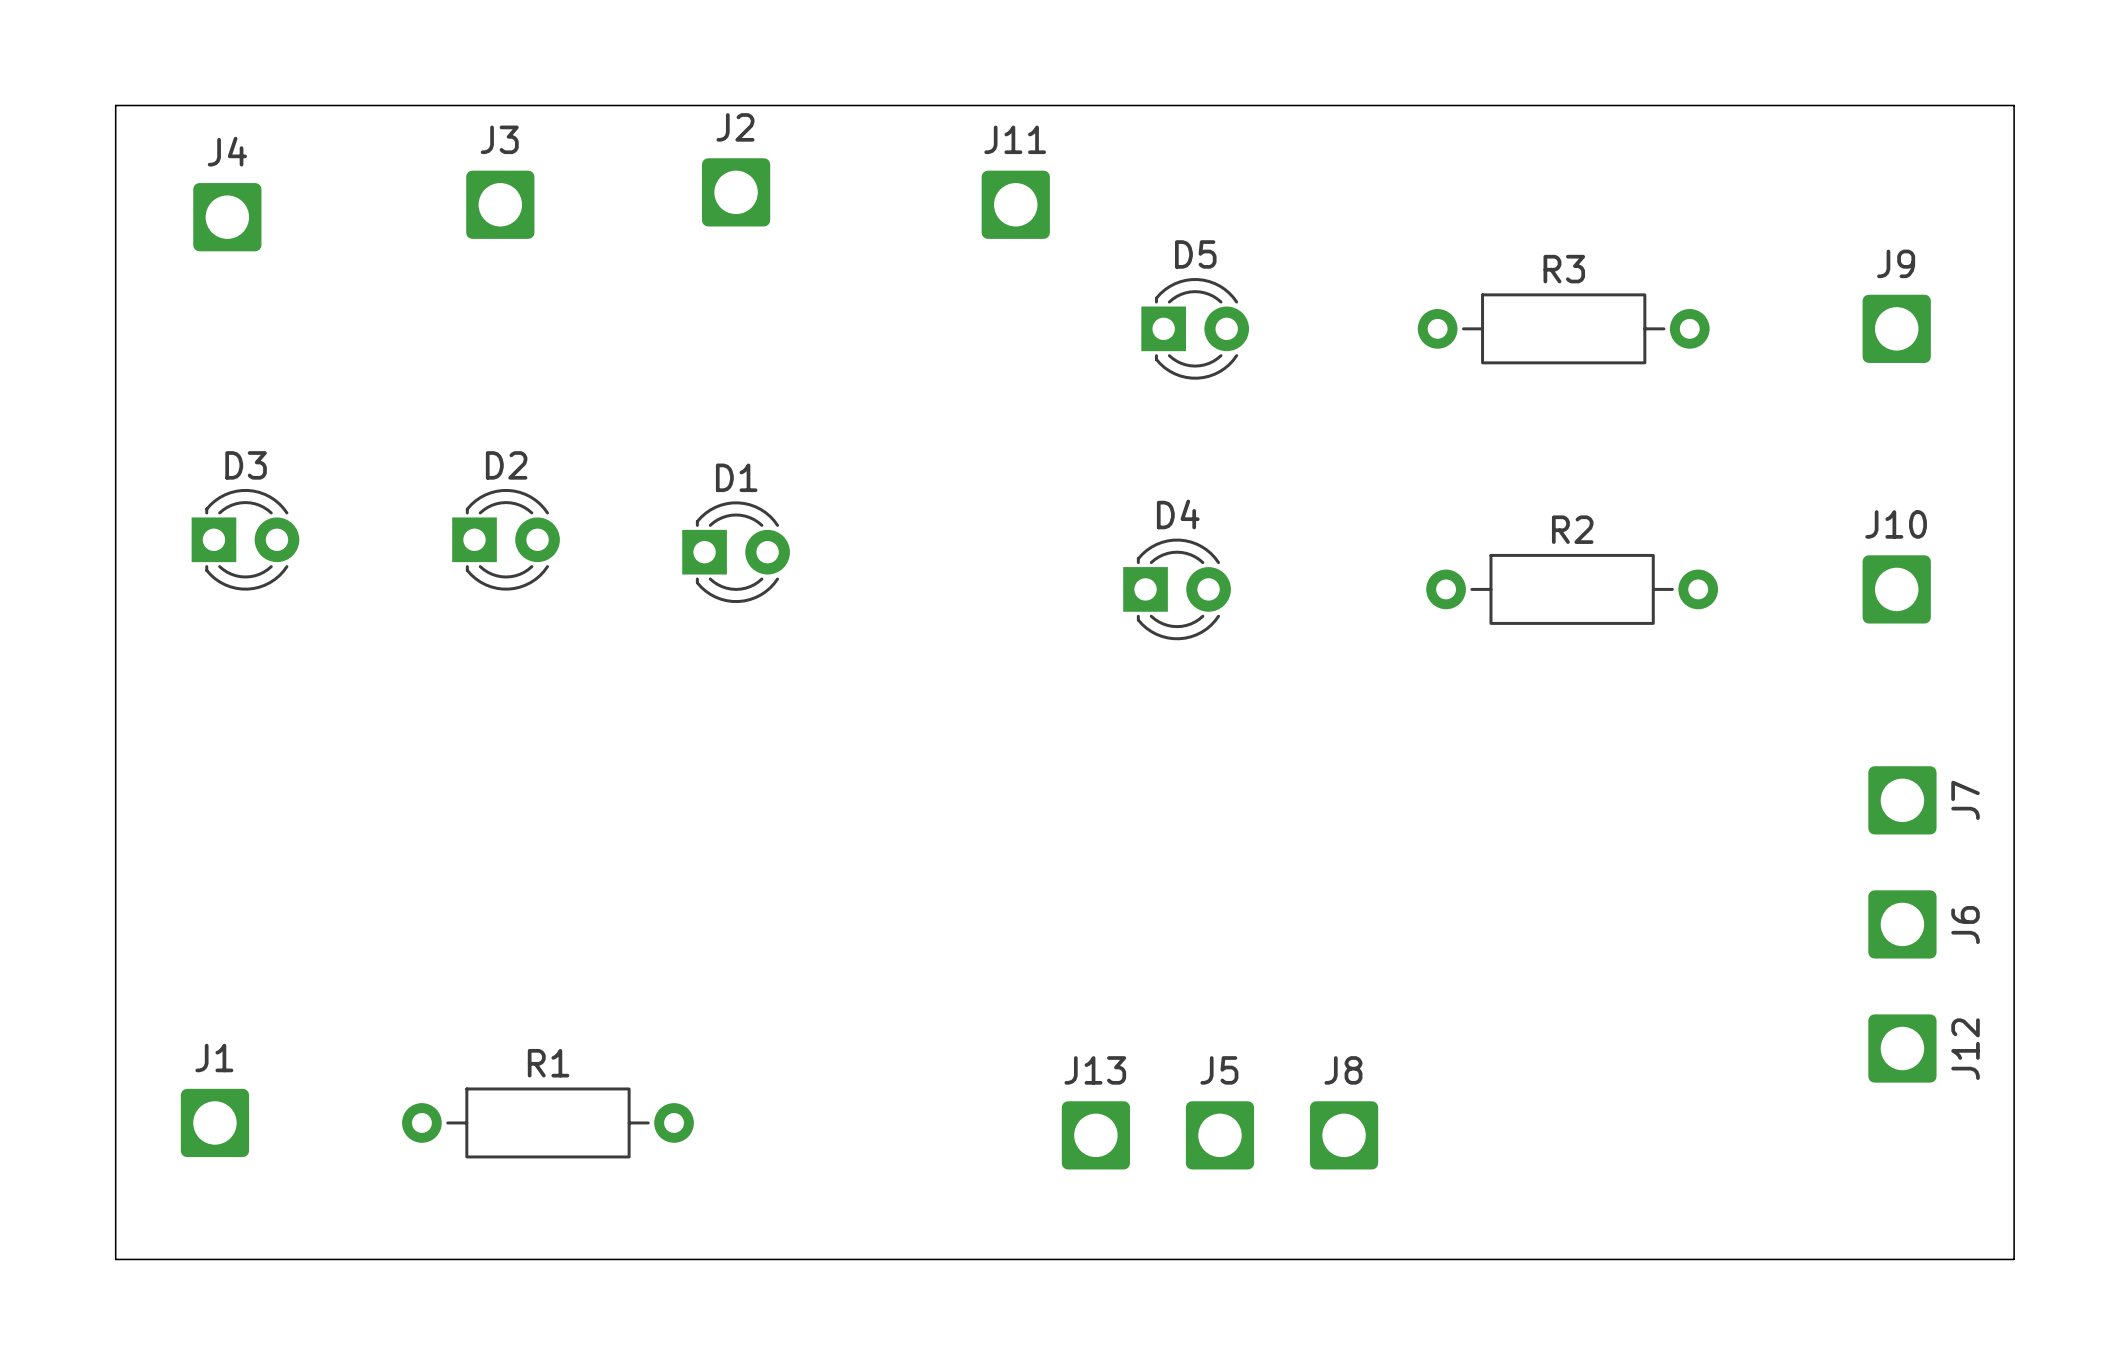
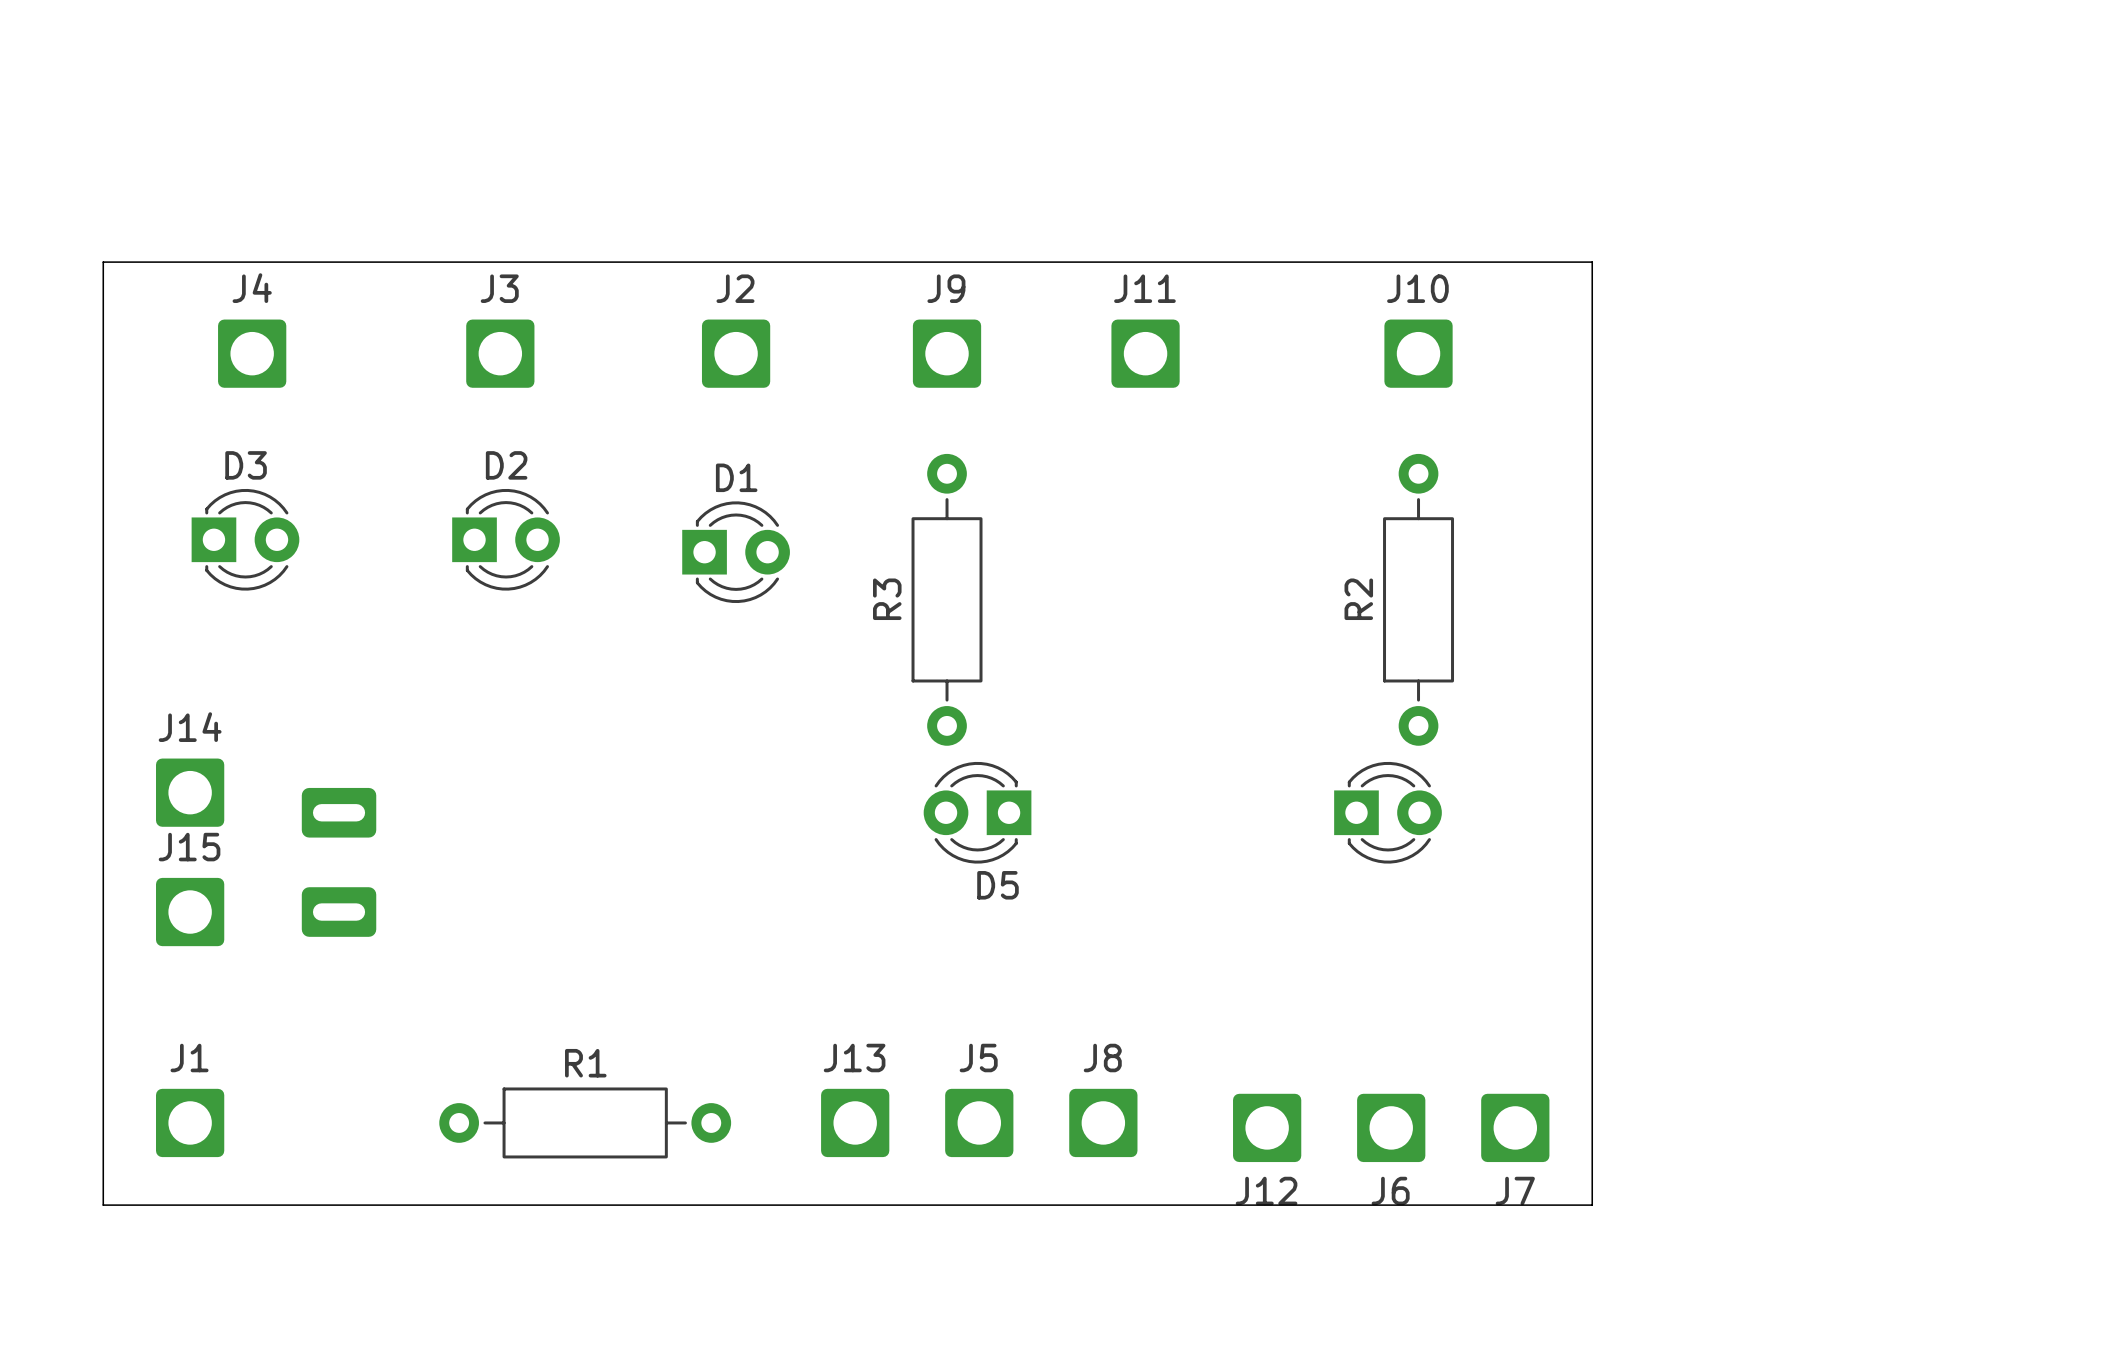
board edge: (115, 105) (2014, 105) (2014, 1259) (115, 1259) (115, 105) -> (103, 262) (103, 1205) (1592, 1205) (1592, 262) (103, 262)
J2 position: (736, 192) -> (736, 353)
J3 position: (500, 204) -> (500, 353)
J11 position: (1015, 204) -> (1145, 353)
J4 position: (227, 217) -> (252, 353)
R3 name position: R3 (1564, 269) -> R3 (887, 599)
D5 rotation: 0° (1195, 328) -> 180° (977, 812)
D5 position: (1195, 328) -> (977, 812)
R3 rotation: 0° (1563, 328) -> 90° clockwise (947, 599)
R3 position: (1563, 328) -> (947, 599)
J9 position: (1896, 328) -> (947, 353)
R2 name position: R2 (1572, 529) -> R2 (1358, 599)
D4: (1177, 589) -> none
R2 rotation: 0° (1572, 589) -> 90° clockwise (1418, 599)
J10 position: (1896, 589) -> (1418, 353)
J14: none -> (190, 792)
J7 position: (1902, 800) -> (1515, 1127)
J7 name rotation: 0° (1965, 800) -> 90° clockwise (1515, 1191)
J7 name position: J7 (1965, 800) -> J7 (1515, 1191)
part: none -> (1387, 812)
part: none -> (339, 862)
J15: none -> (190, 912)
J6 position: (1902, 924) -> (1391, 1127)
J6 name rotation: 0° (1965, 925) -> 90° clockwise (1390, 1191)
J6 name position: J6 (1965, 925) -> J6 (1390, 1191)
J12 position: (1902, 1048) -> (1267, 1127)
J12 name rotation: 0° (1965, 1049) -> 90° clockwise (1266, 1191)
J12 name position: J12 (1965, 1049) -> J12 (1266, 1191)
J1 position: (214, 1122) -> (190, 1122)
R1 position: (547, 1122) -> (585, 1122)
J13 position: (1095, 1135) -> (855, 1122)
J5 position: (1219, 1135) -> (979, 1122)
J8 position: (1344, 1135) -> (1103, 1122)

